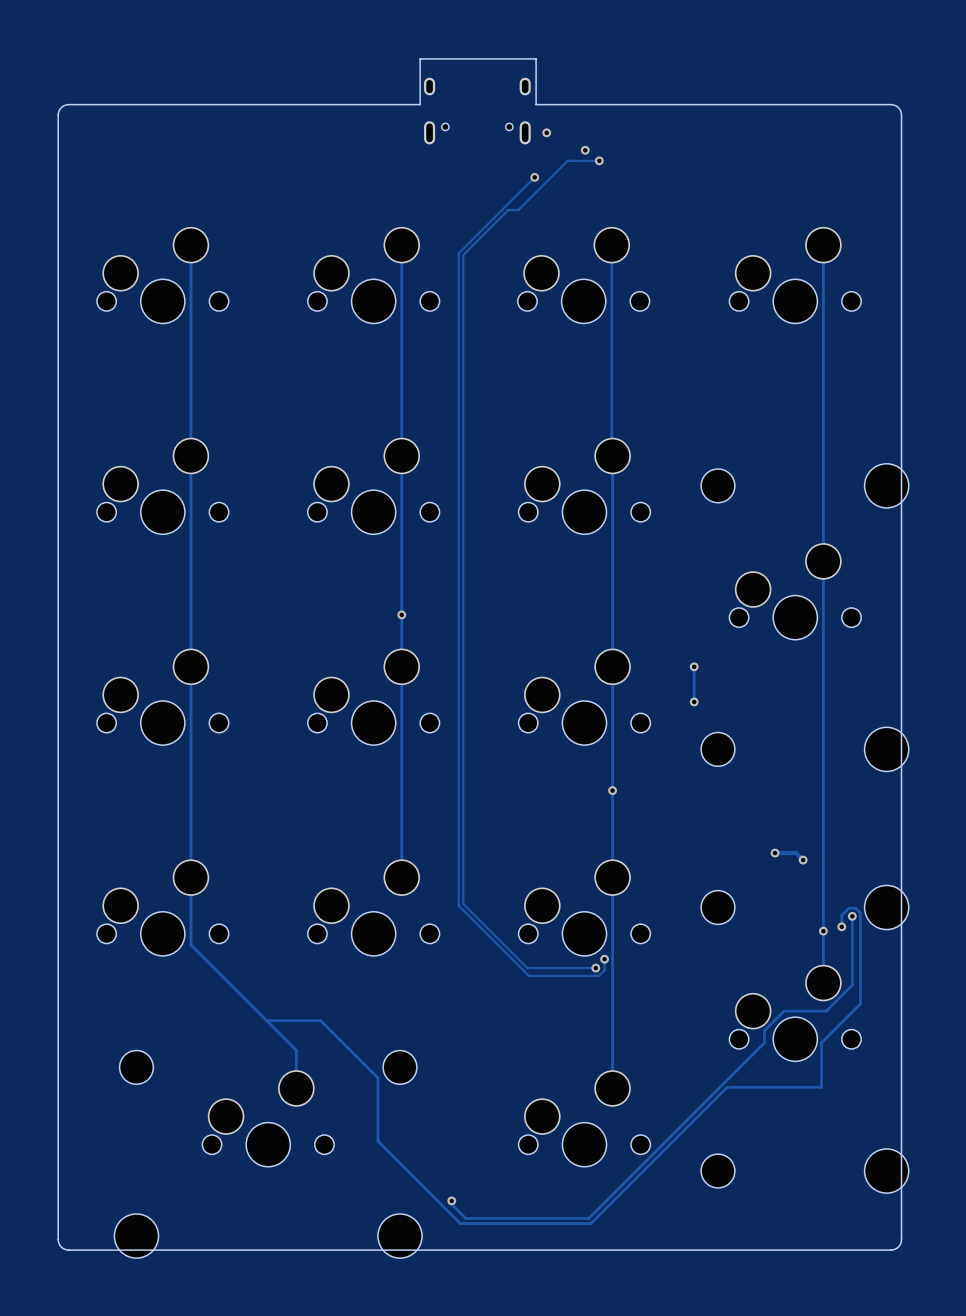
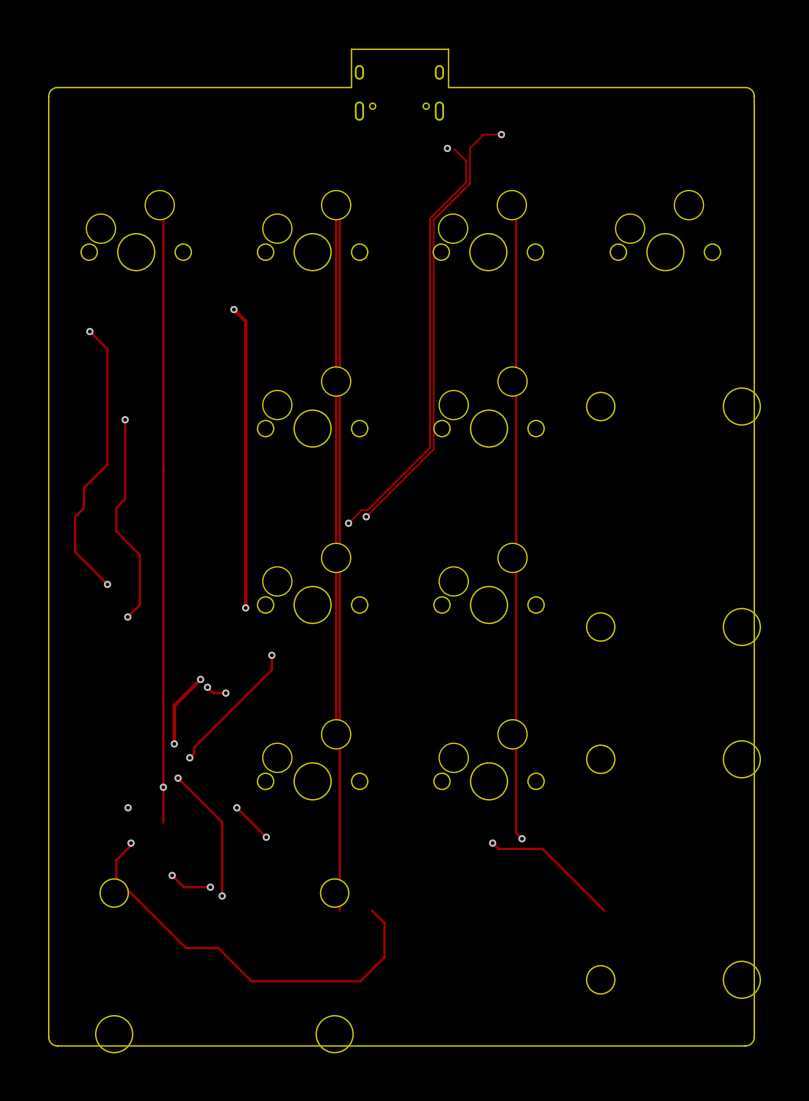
via: (546, 132) -> none
via: (585, 150) -> none
track: (578, 160) (567, 160) (518, 210) (508, 210) (463, 255) (463, 903) (527, 968) (595, 968) -> (483, 134) (469, 148) (469, 183) (433, 219) (433, 449) (366, 516)
track: (534, 177) (458, 253) (458, 905) (528, 975) (599, 975) (604, 970) (604, 959) -> none
track: none -> (454, 149) (466, 161) (466, 182) (429, 218) (429, 447) (367, 510) (361, 510) (348, 523)
track: (190, 245) (190, 944) (296, 1050) (296, 1088) -> none
track: none -> (163, 205) (163, 822)
track: none -> (339, 205) (339, 910)
track: (611, 245) (612, 1088) -> none
track: none -> (516, 205) (516, 832) (522, 838)
track: (823, 245) (823, 983) -> none
track: none -> (233, 309) (245, 321) (245, 607)
via: none -> (233, 309)
track: none -> (89, 331) (107, 349) (107, 464) (83, 487) (83, 507) (75, 516) (75, 552) (107, 584)
via: none -> (89, 331)
part: (162, 486) -> none
track: none -> (125, 419) (125, 499) (116, 507) (116, 531) (139, 554) (139, 604) (127, 617)
via: none -> (125, 419)
part: (795, 591) -> none
via: (401, 614) -> none
via: none -> (366, 516)
via: none -> (348, 523)
track: (694, 666) (694, 701) -> none
via: (694, 666) -> none
part: (162, 696) -> none
via: none -> (107, 584)
via: (694, 701) -> none
via: none -> (245, 607)
via: none -> (127, 617)
track: none -> (271, 655) (271, 669) (194, 747) (194, 753) (189, 757)
via: none -> (271, 655)
via: (612, 790) -> none
track: none -> (200, 679) (174, 705) (174, 743)
via: none -> (200, 679)
track: none -> (207, 687) (213, 693) (225, 693)
via: none -> (207, 687)
via: none -> (225, 693)
track: (775, 853) (796, 853) (803, 860) -> none
via: (775, 853) -> none
via: (803, 860) -> none
via: none -> (174, 743)
via: none -> (189, 757)
part: (162, 907) -> none
track: (852, 916) (852, 985) (826, 1011) (784, 1011) (764, 1030) (764, 1042) (588, 1218) (465, 1218) (451, 1204) (451, 1200) -> none
via: (852, 916) -> none
track: (841, 926) (841, 915) (848, 908) (855, 908) (860, 913) (860, 1003) (821, 1042) (821, 1087) (727, 1087) (590, 1223) (460, 1223) (377, 1141) (377, 1077) (320, 1020) (266, 1020) -> none
via: (841, 926) -> none
track: none -> (178, 778) (222, 822) (222, 896)
via: none -> (178, 778)
via: (823, 931) -> none
via: none -> (163, 787)
via: (604, 959) -> none
via: none -> (128, 807)
track: none -> (236, 807) (266, 837)
via: none -> (236, 807)
via: (595, 968) -> none
via: none -> (266, 837)
via: none -> (522, 838)
track: none -> (131, 843) (131, 845) (116, 860) (116, 878) (185, 948) (218, 948) (251, 981) (360, 981) (384, 957) (384, 923) (372, 910)
via: none -> (131, 843)
track: none -> (492, 843) (498, 848) (542, 848) (604, 910)
via: none -> (492, 843)
part: (795, 1013) -> none
track: none -> (172, 875) (183, 887) (210, 887)
via: none -> (172, 875)
via: none -> (210, 887)
via: none -> (222, 896)
part: (268, 1118) -> none
part: (584, 1118) -> none
via: (451, 1200) -> none

